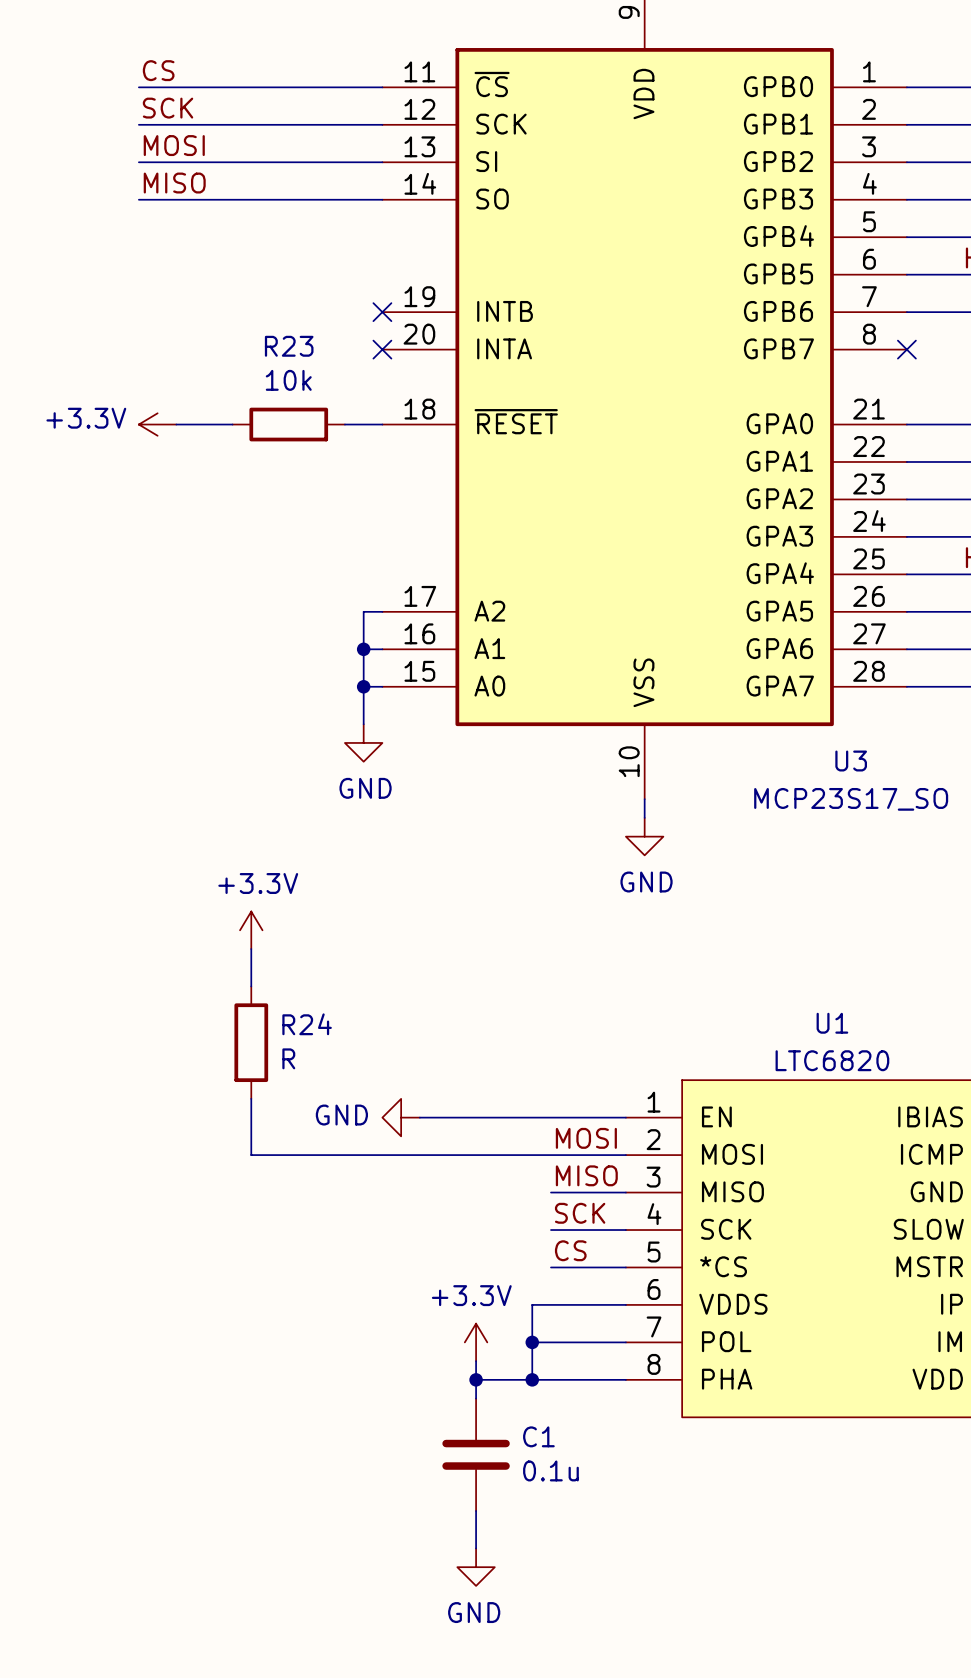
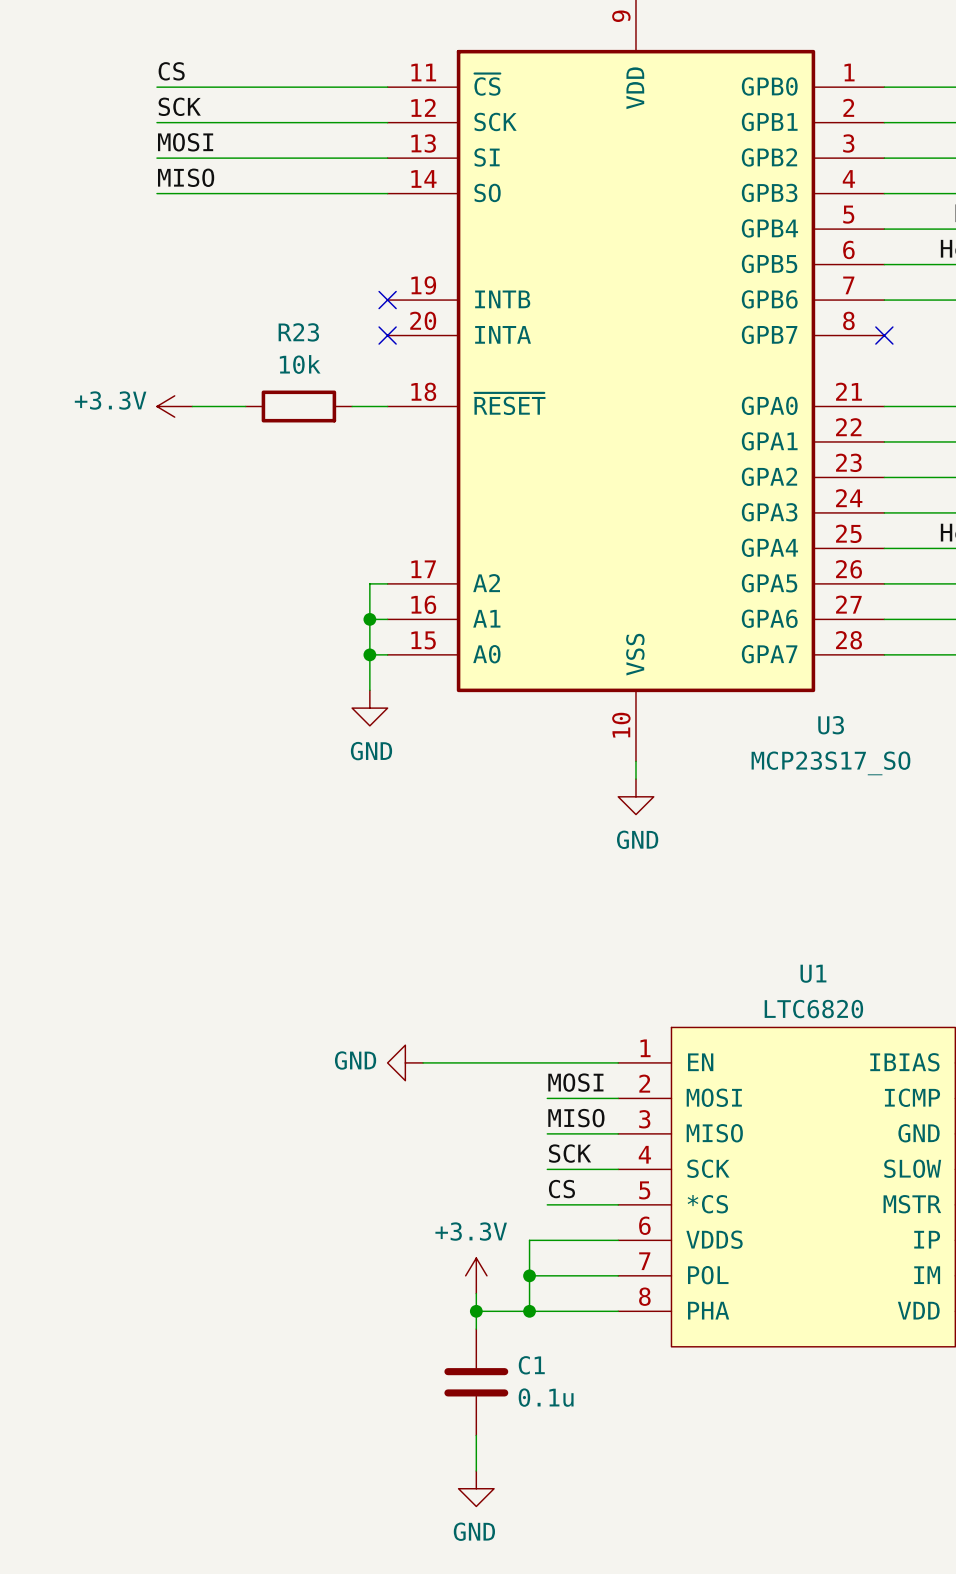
power symbol: +3.3V (251, 930) -> none
wire: (251, 949) (251, 986) -> none
R24: R (251, 1042) -> none
wire: (251, 1098) (251, 1155) (550, 1155) -> none

